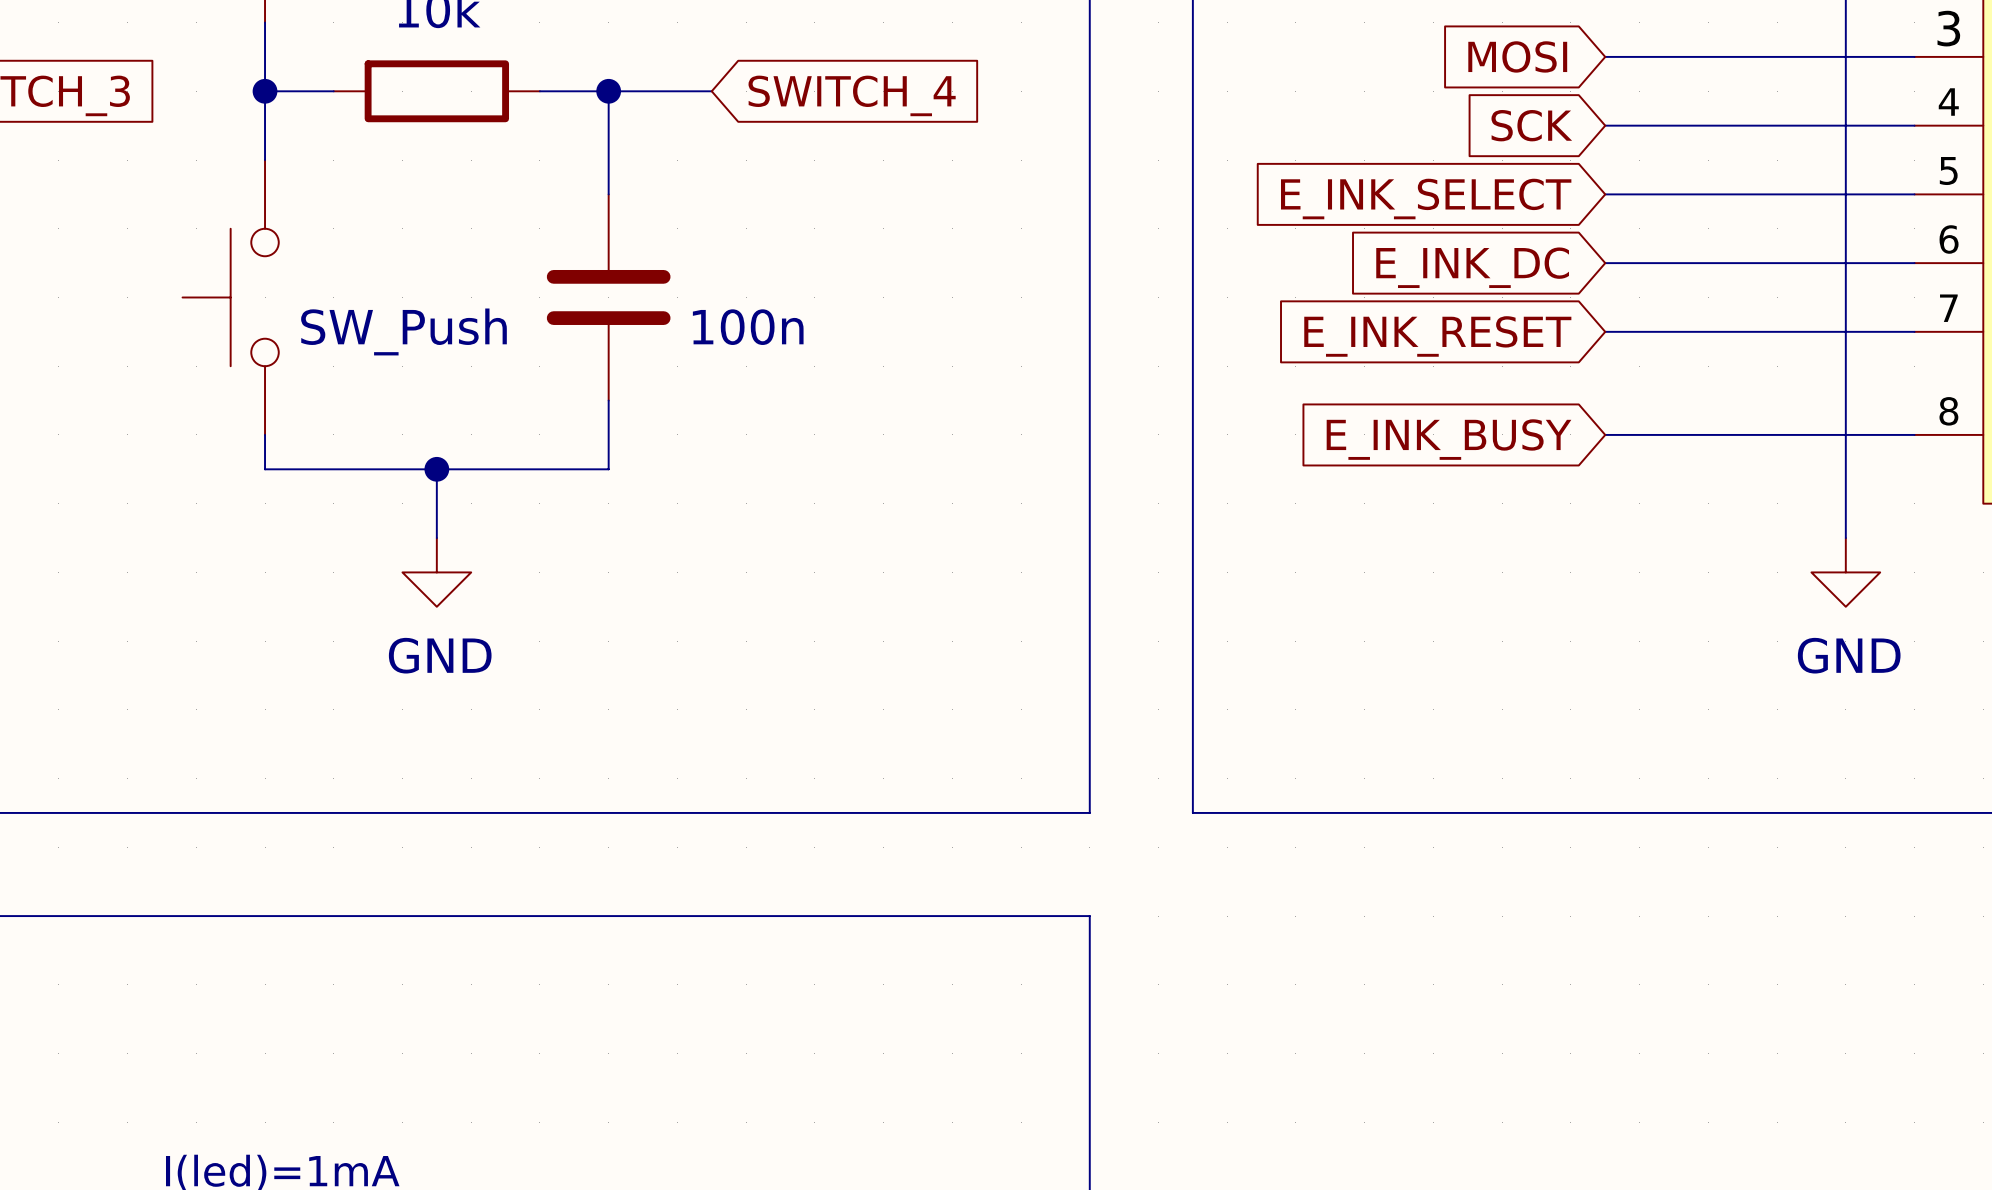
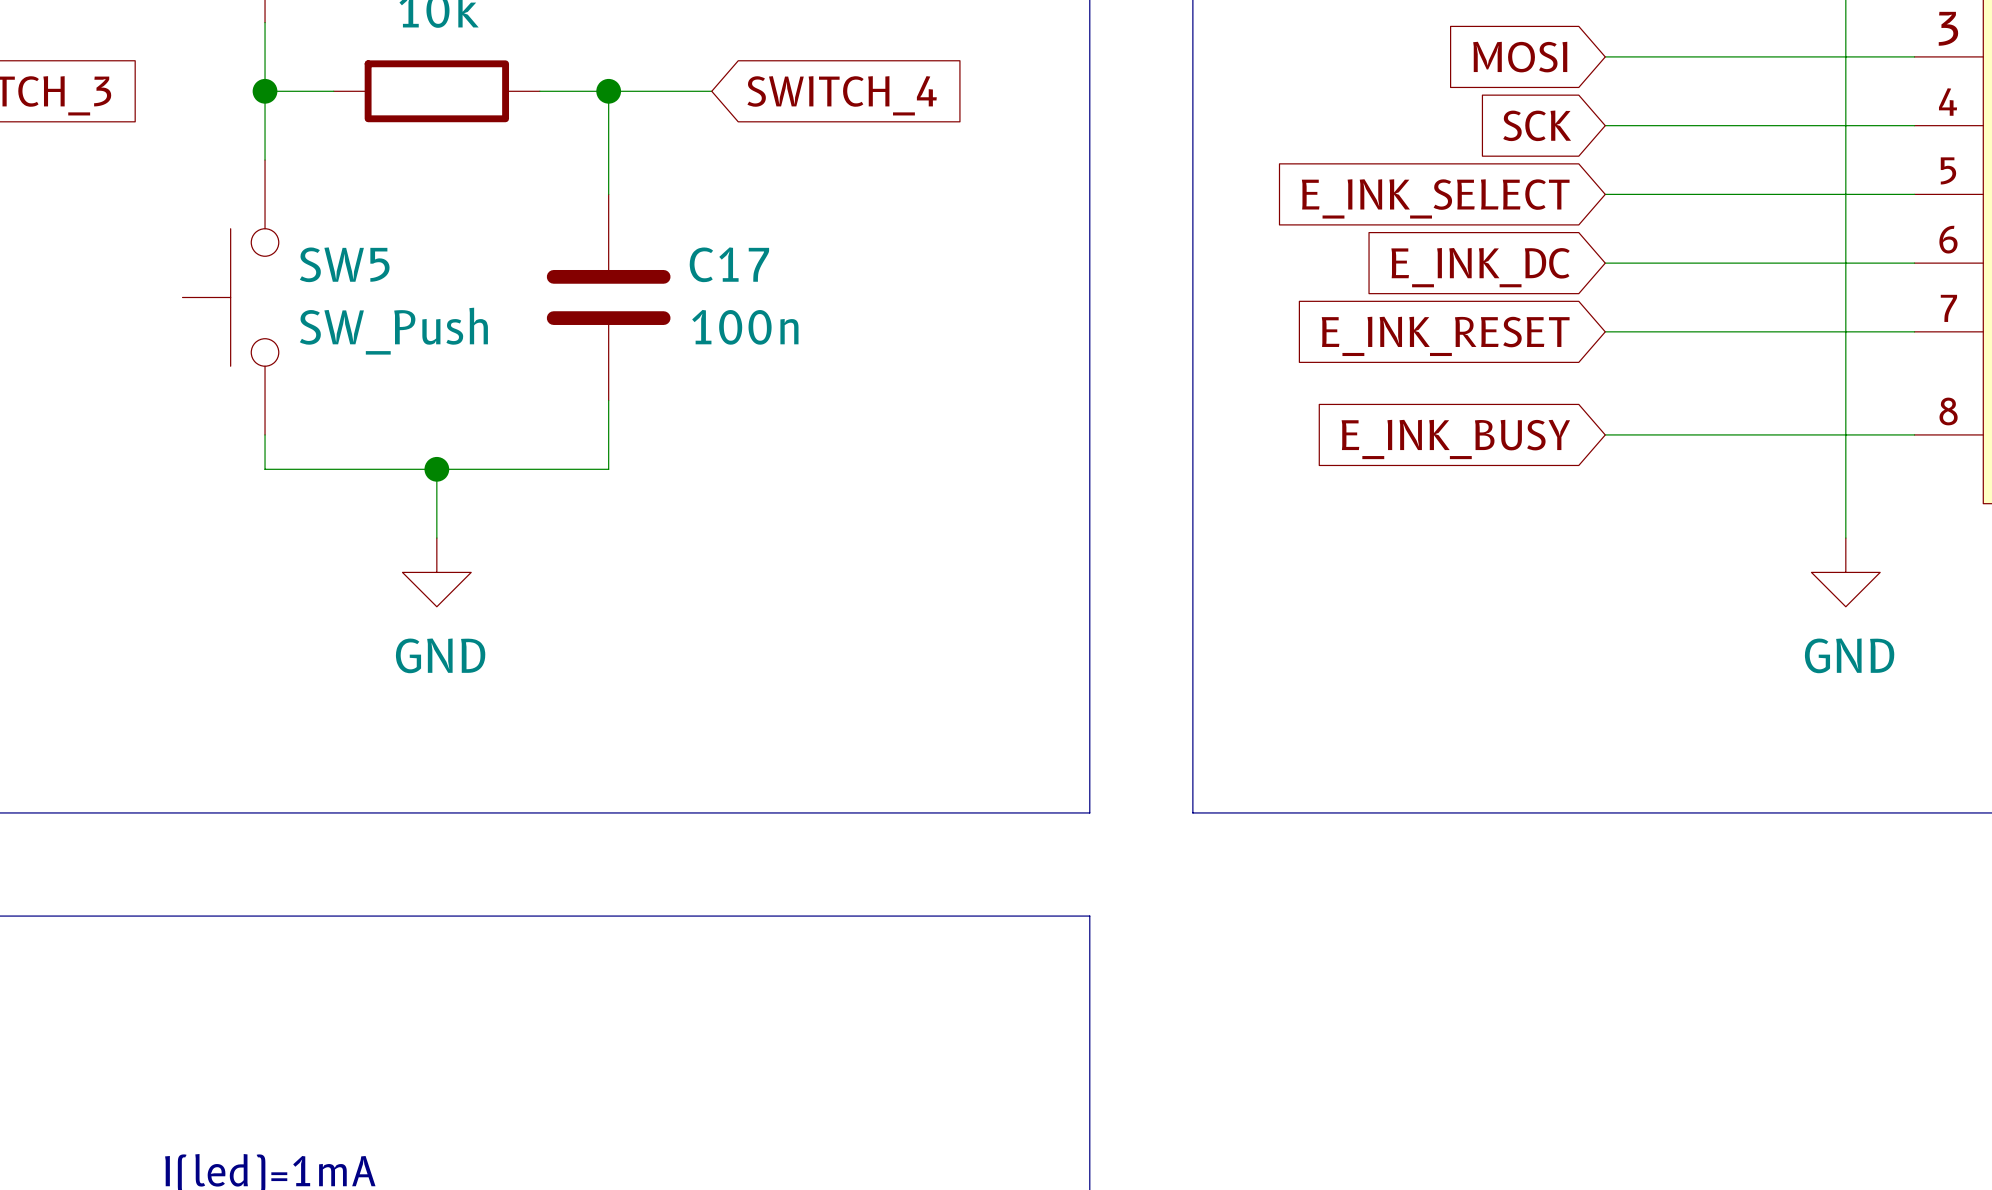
SW5 name: none -> SW5 (344, 264)
C17 name: none -> C17 (729, 264)

